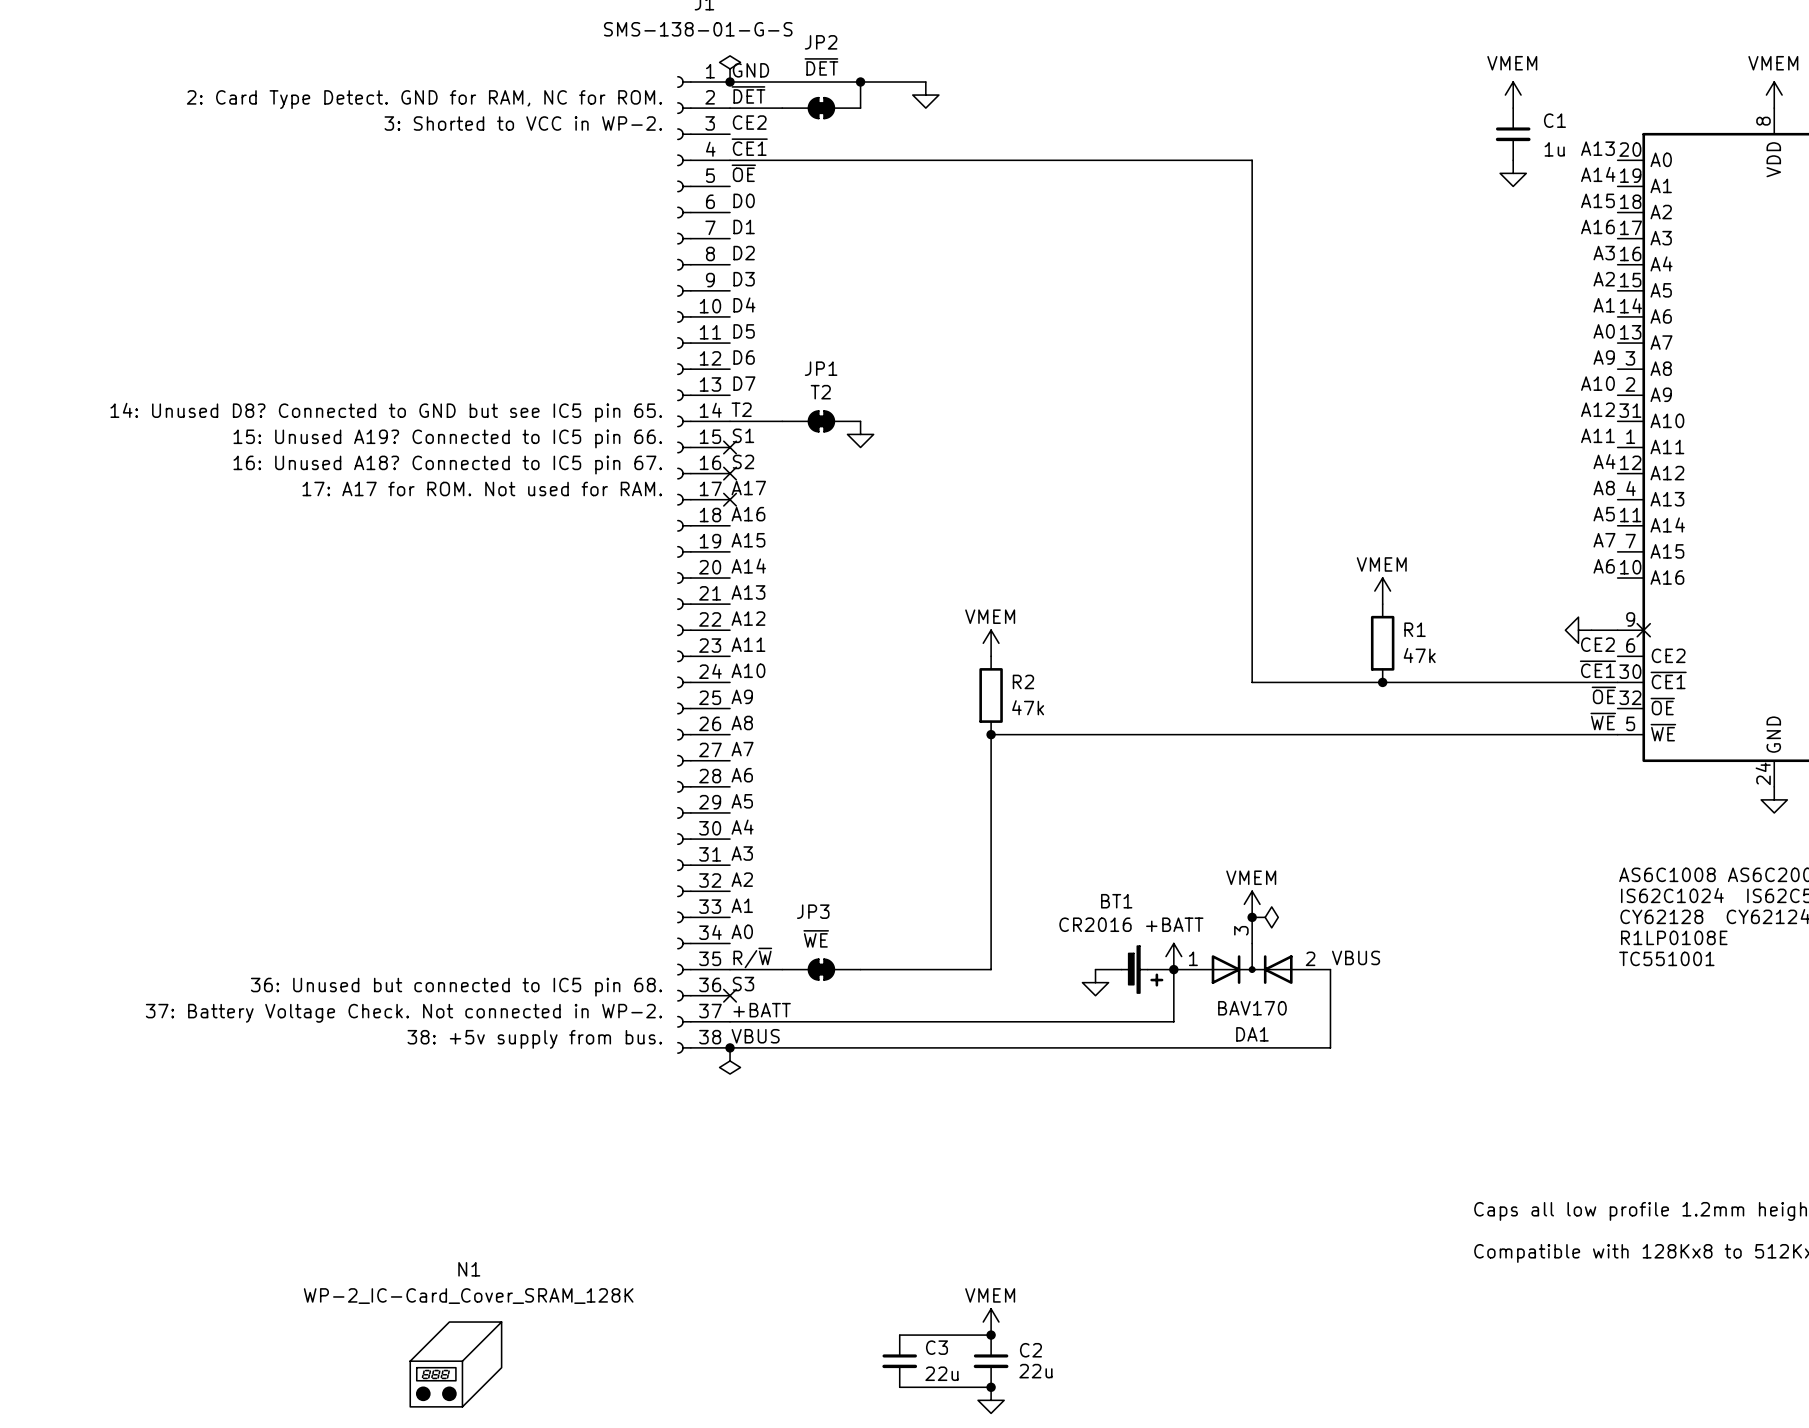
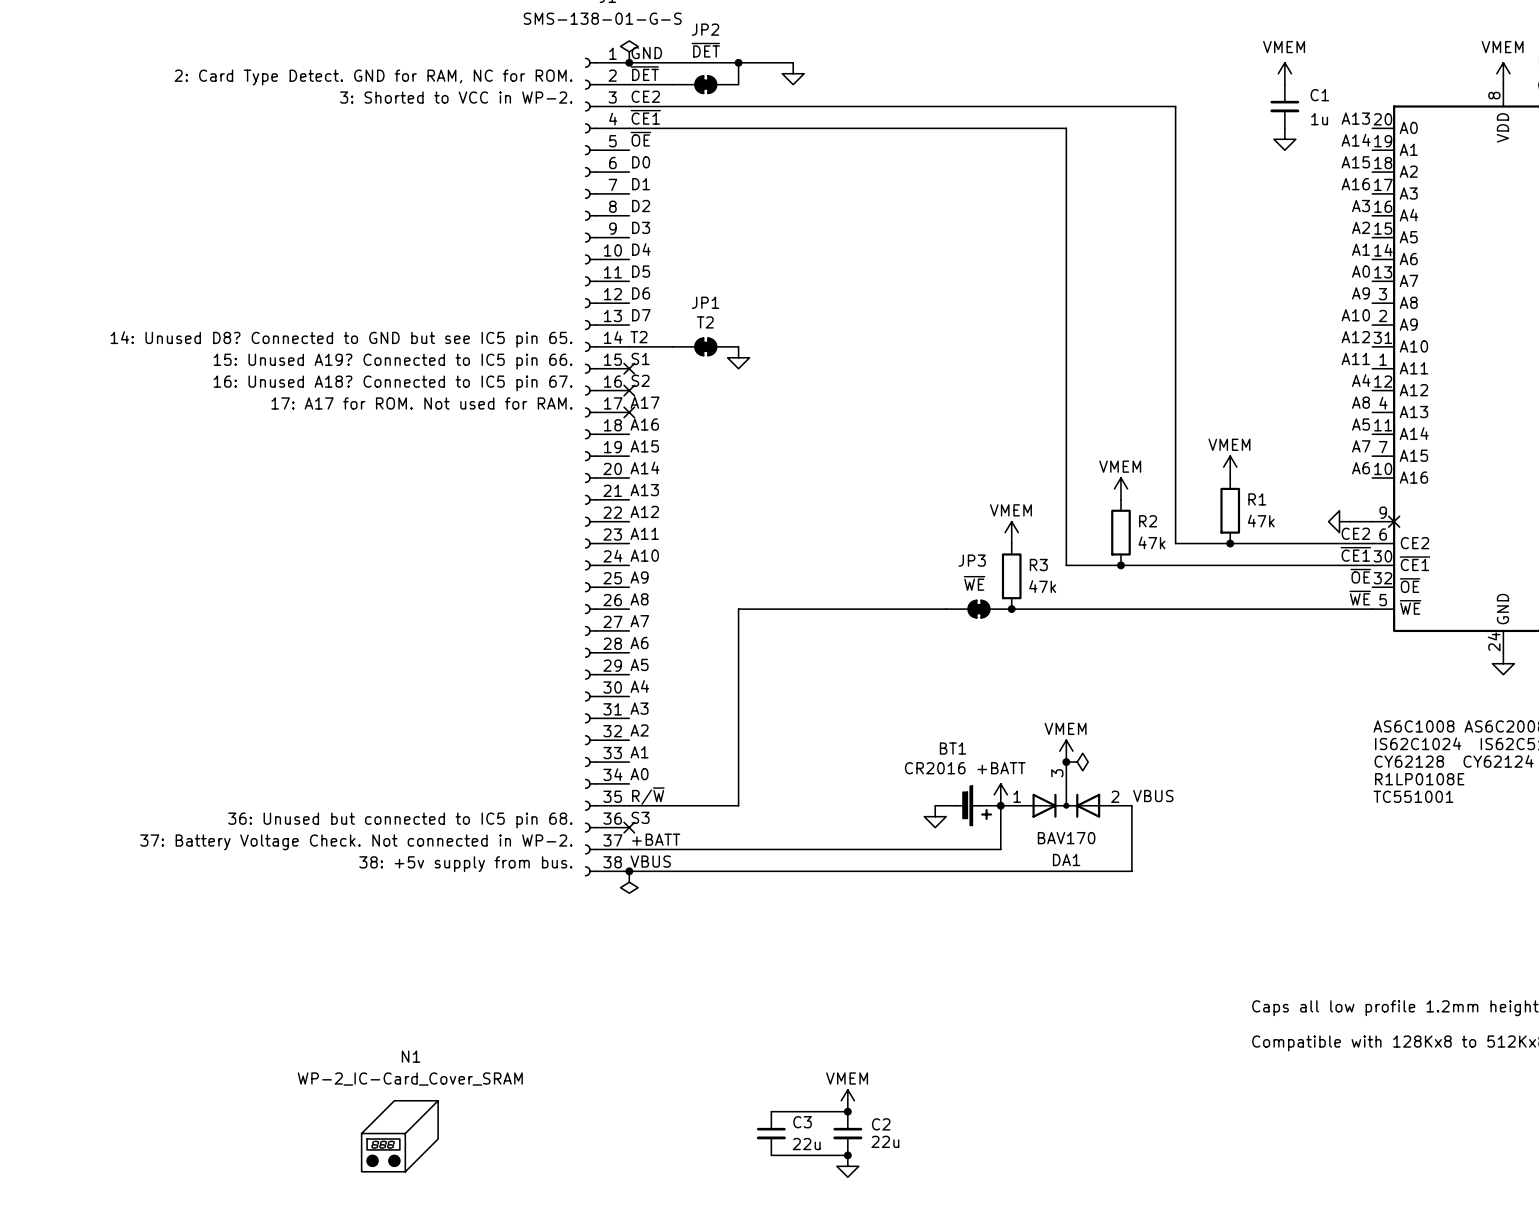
wire: none -> (629, 106) (1175, 106) (1175, 543) (1372, 543)
power symbol: none -> VMEM (1230, 467)
power symbol: none -> VMEM (1120, 488)
power symbol: VMEM (1382, 591) -> none
power symbol: VMEM (991, 643) -> none
power symbol: none -> VMEM (1011, 532)
R1 position: (1382, 643) -> (1230, 510)
junction: none -> (1230, 543)
junction: none -> (1120, 565)
junction: (1382, 682) -> none
R2 position: (991, 695) -> (1120, 532)
R3: none -> 47k (1011, 576)
wire: (991, 734) (991, 969) (860, 969) -> (847, 609) (738, 609) (738, 805) (673, 805)
junction: (991, 734) -> none
junction: none -> (1011, 609)
JP3 position: (821, 969) -> (978, 609)
N1 value: WP-2_IC-Card_Cover_SRAM_128K (468, 1296) -> WP-2_IC-Card_Cover_SRAM (410, 1079)

